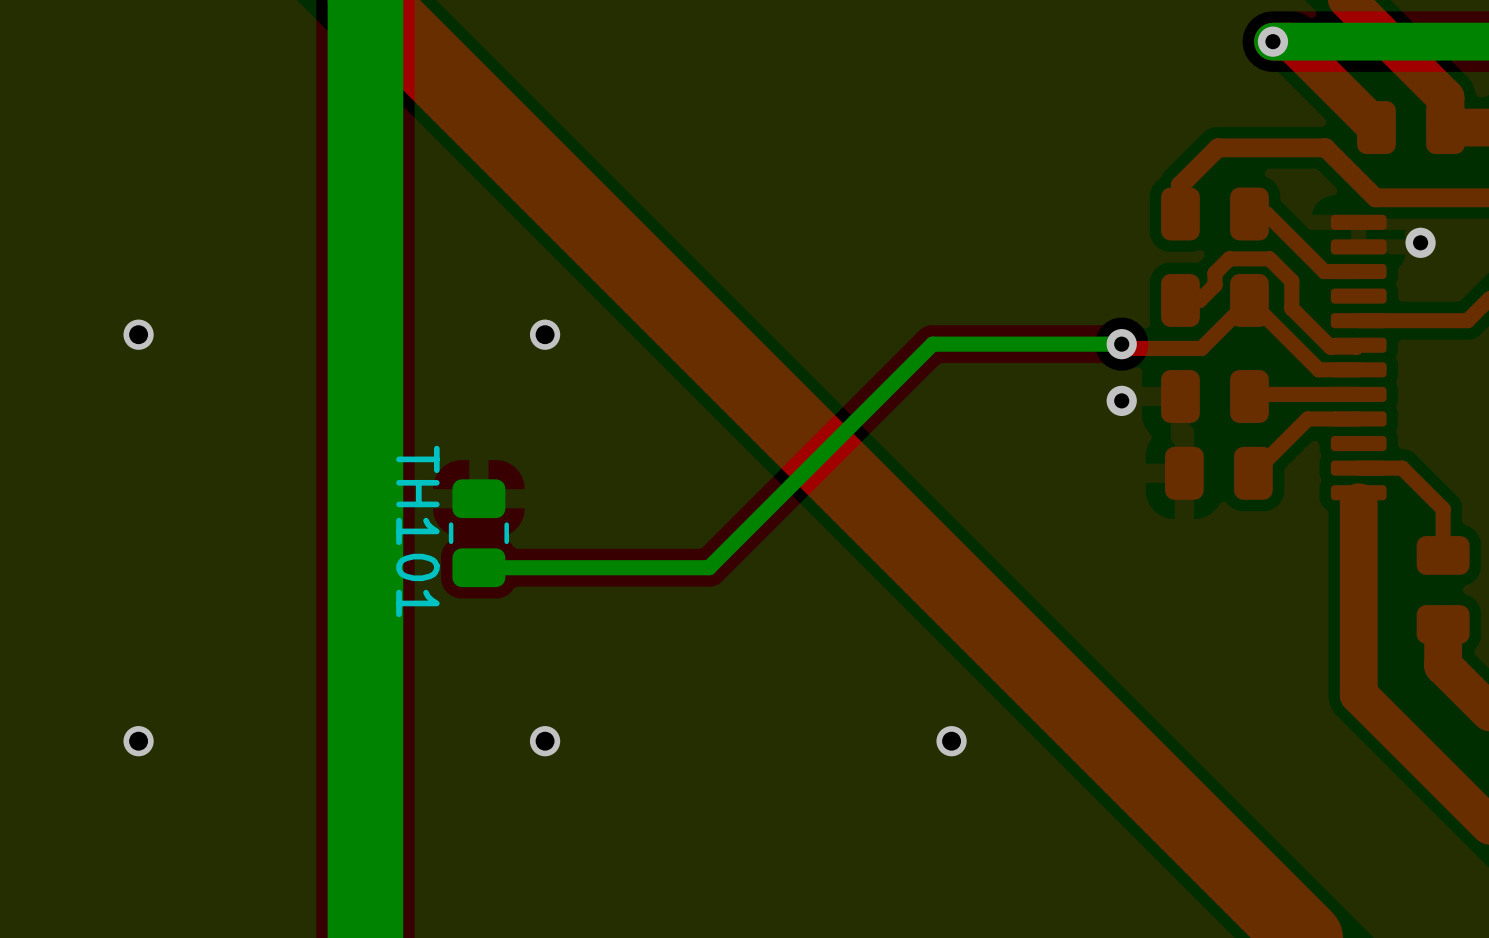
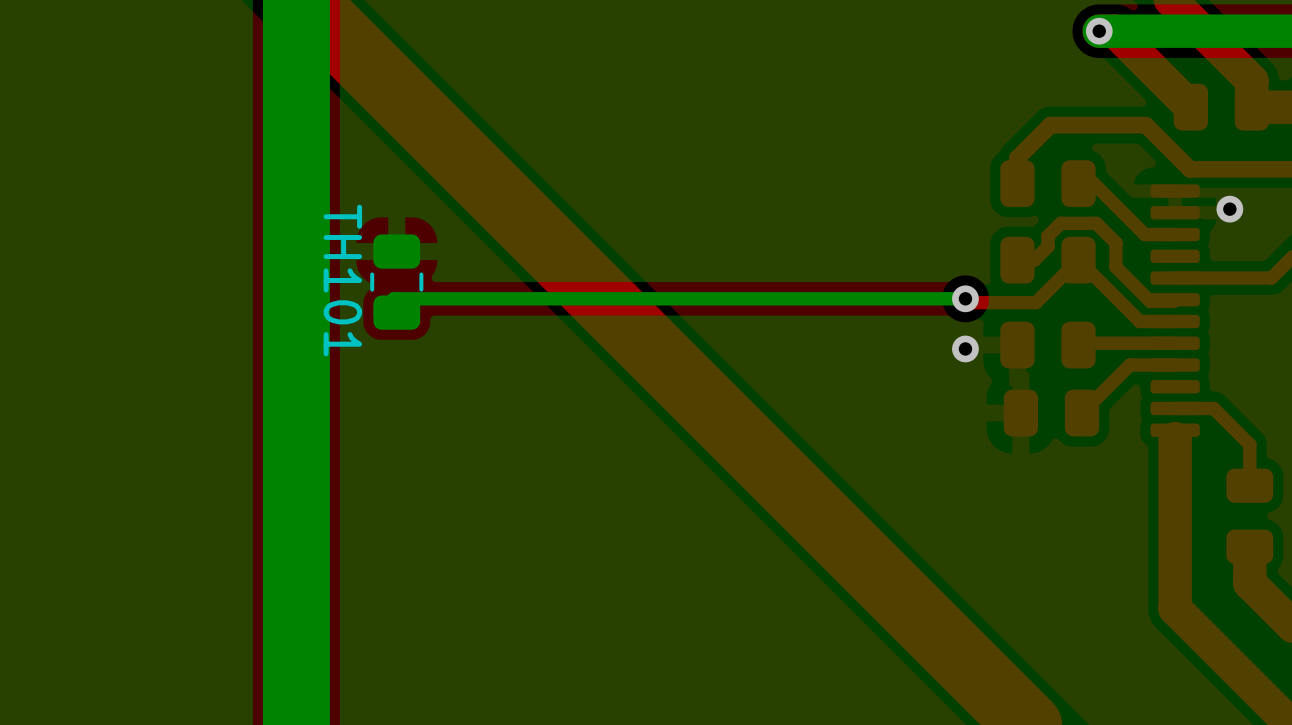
via: (138, 334) -> none
via: (545, 334) -> none
bottom track: (932, 344) (709, 567) (478, 567) -> (798, 298) (393, 298) (380, 312)
TH101 position: (478, 533) -> (396, 282)
via: (138, 741) -> none
via: (545, 741) -> none
via: (951, 741) -> none

